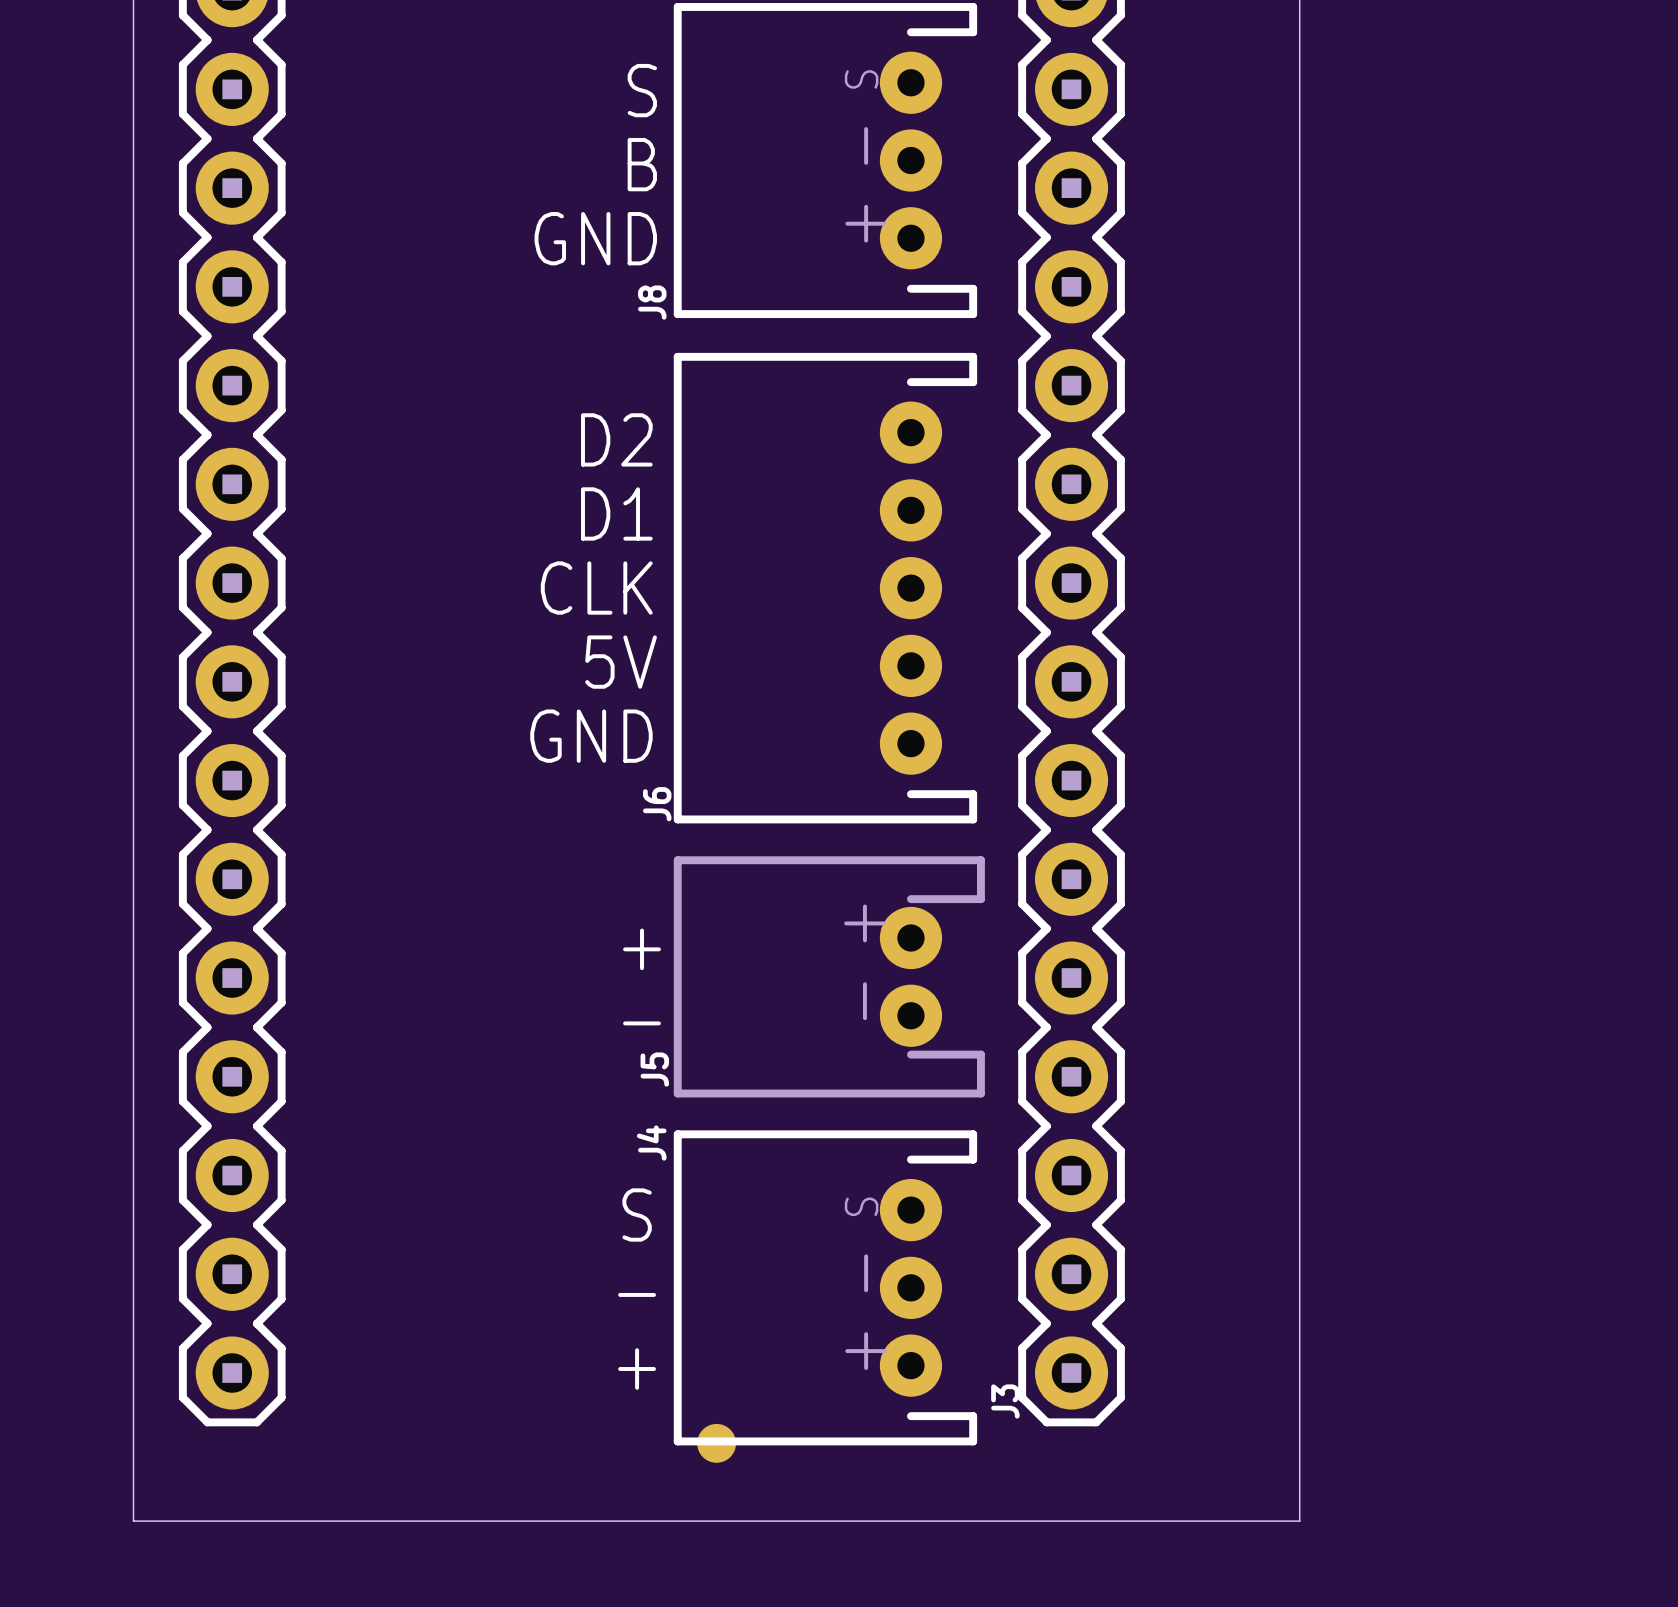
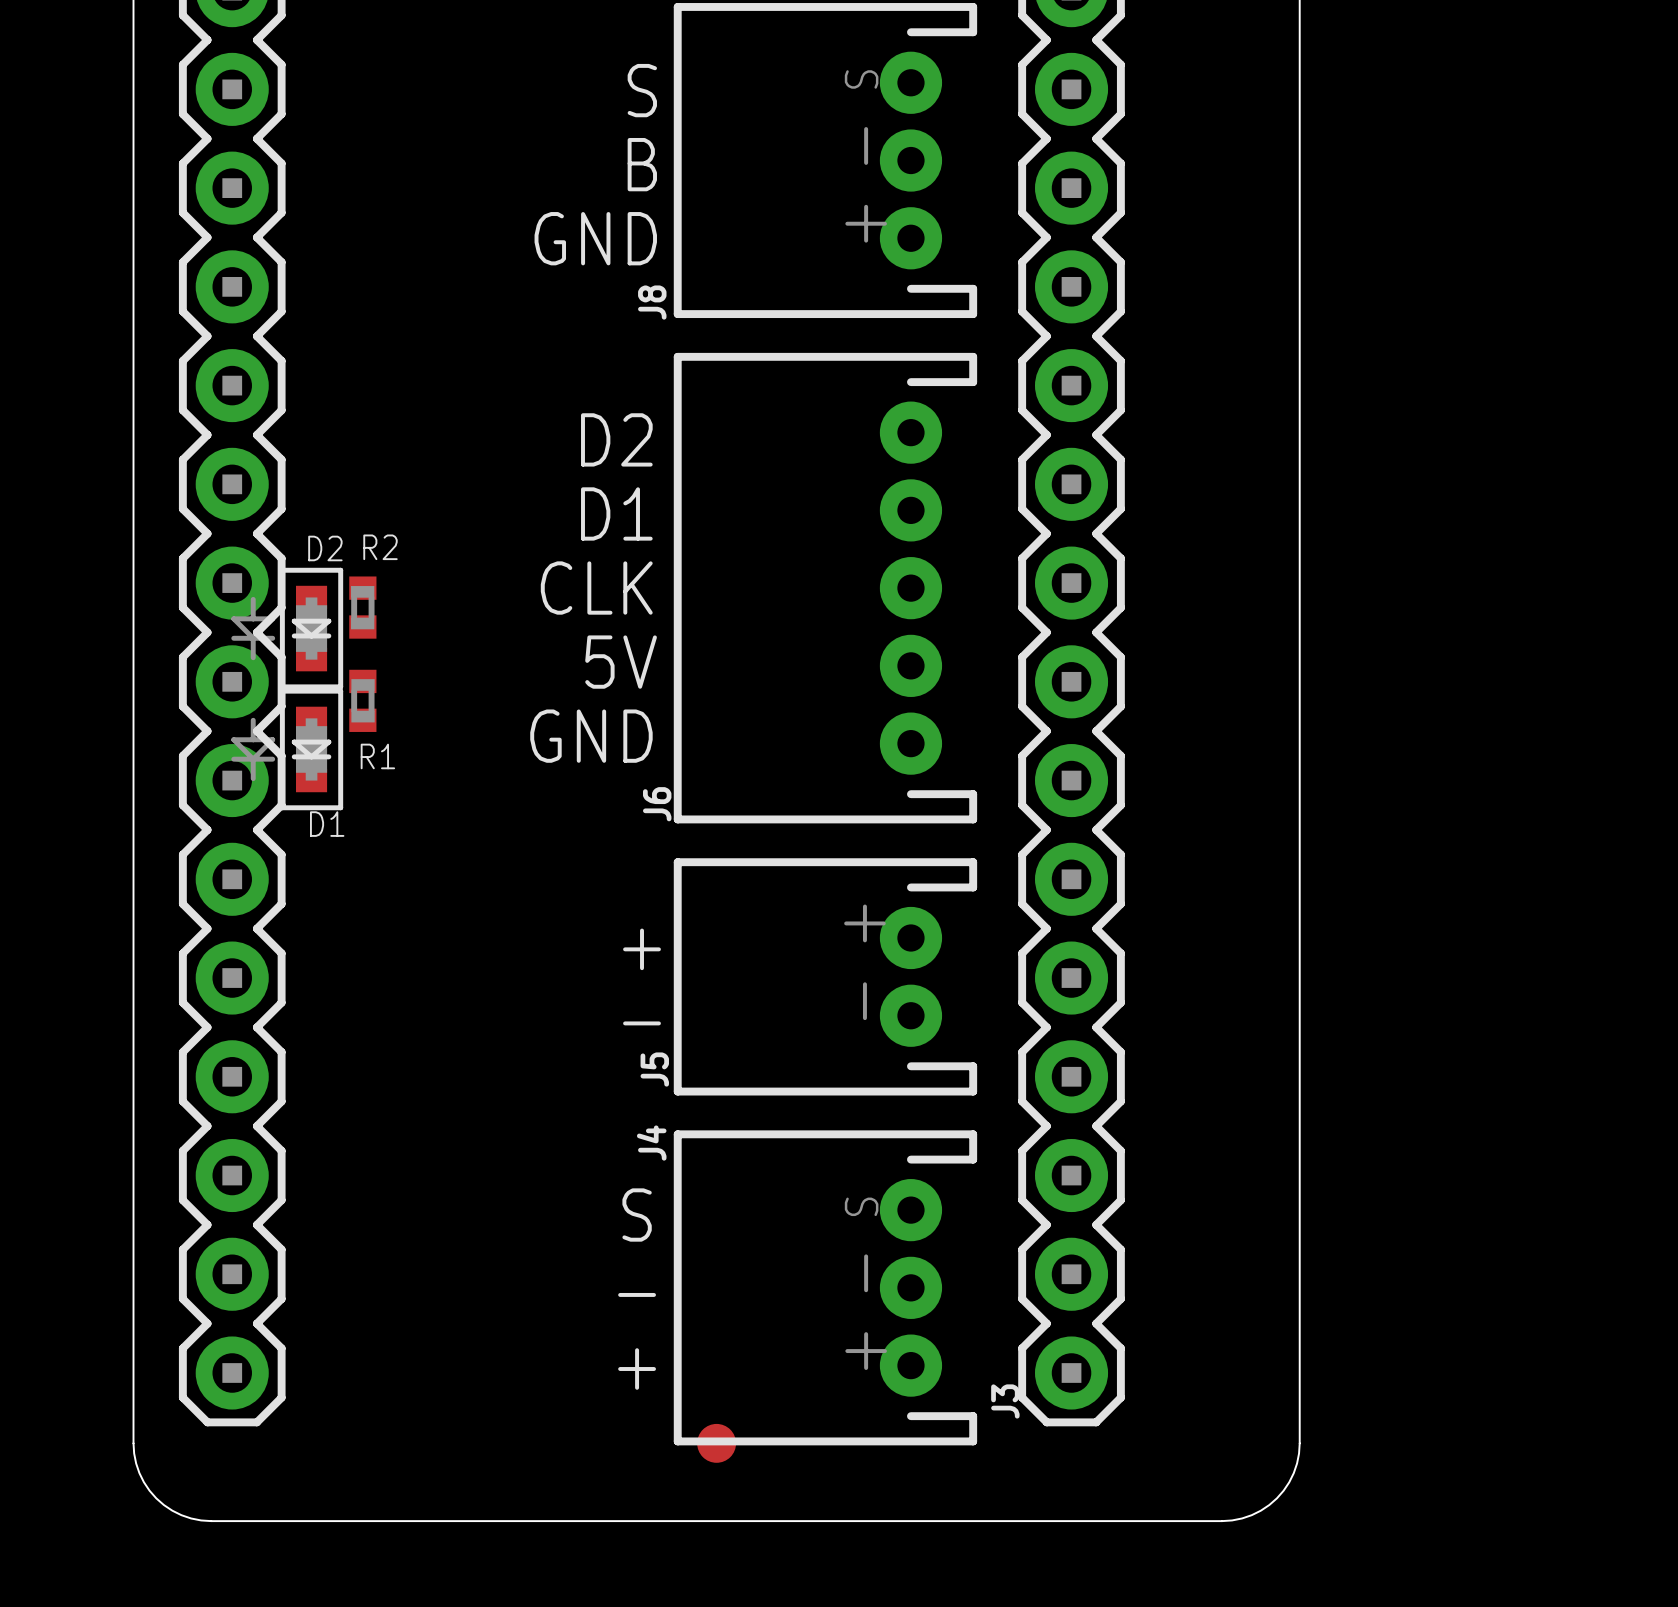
R2: none -> (362, 607)
D2: none -> (287, 628)
R1: none -> (362, 700)
D1: none -> (287, 749)
J5 footprint: [673, 856, 985, 1098] -> [673, 858, 978, 1096]
board edge: (133, 1443) (133, 1521) (211, 1521) -> (133, 1443) (139, 1473) (156, 1498) (181, 1515) (211, 1521)
board edge: (1299, 1443) (1299, 1521) (1221, 1521) -> (1299, 1443) (1293, 1473) (1276, 1498) (1251, 1515) (1221, 1521)

